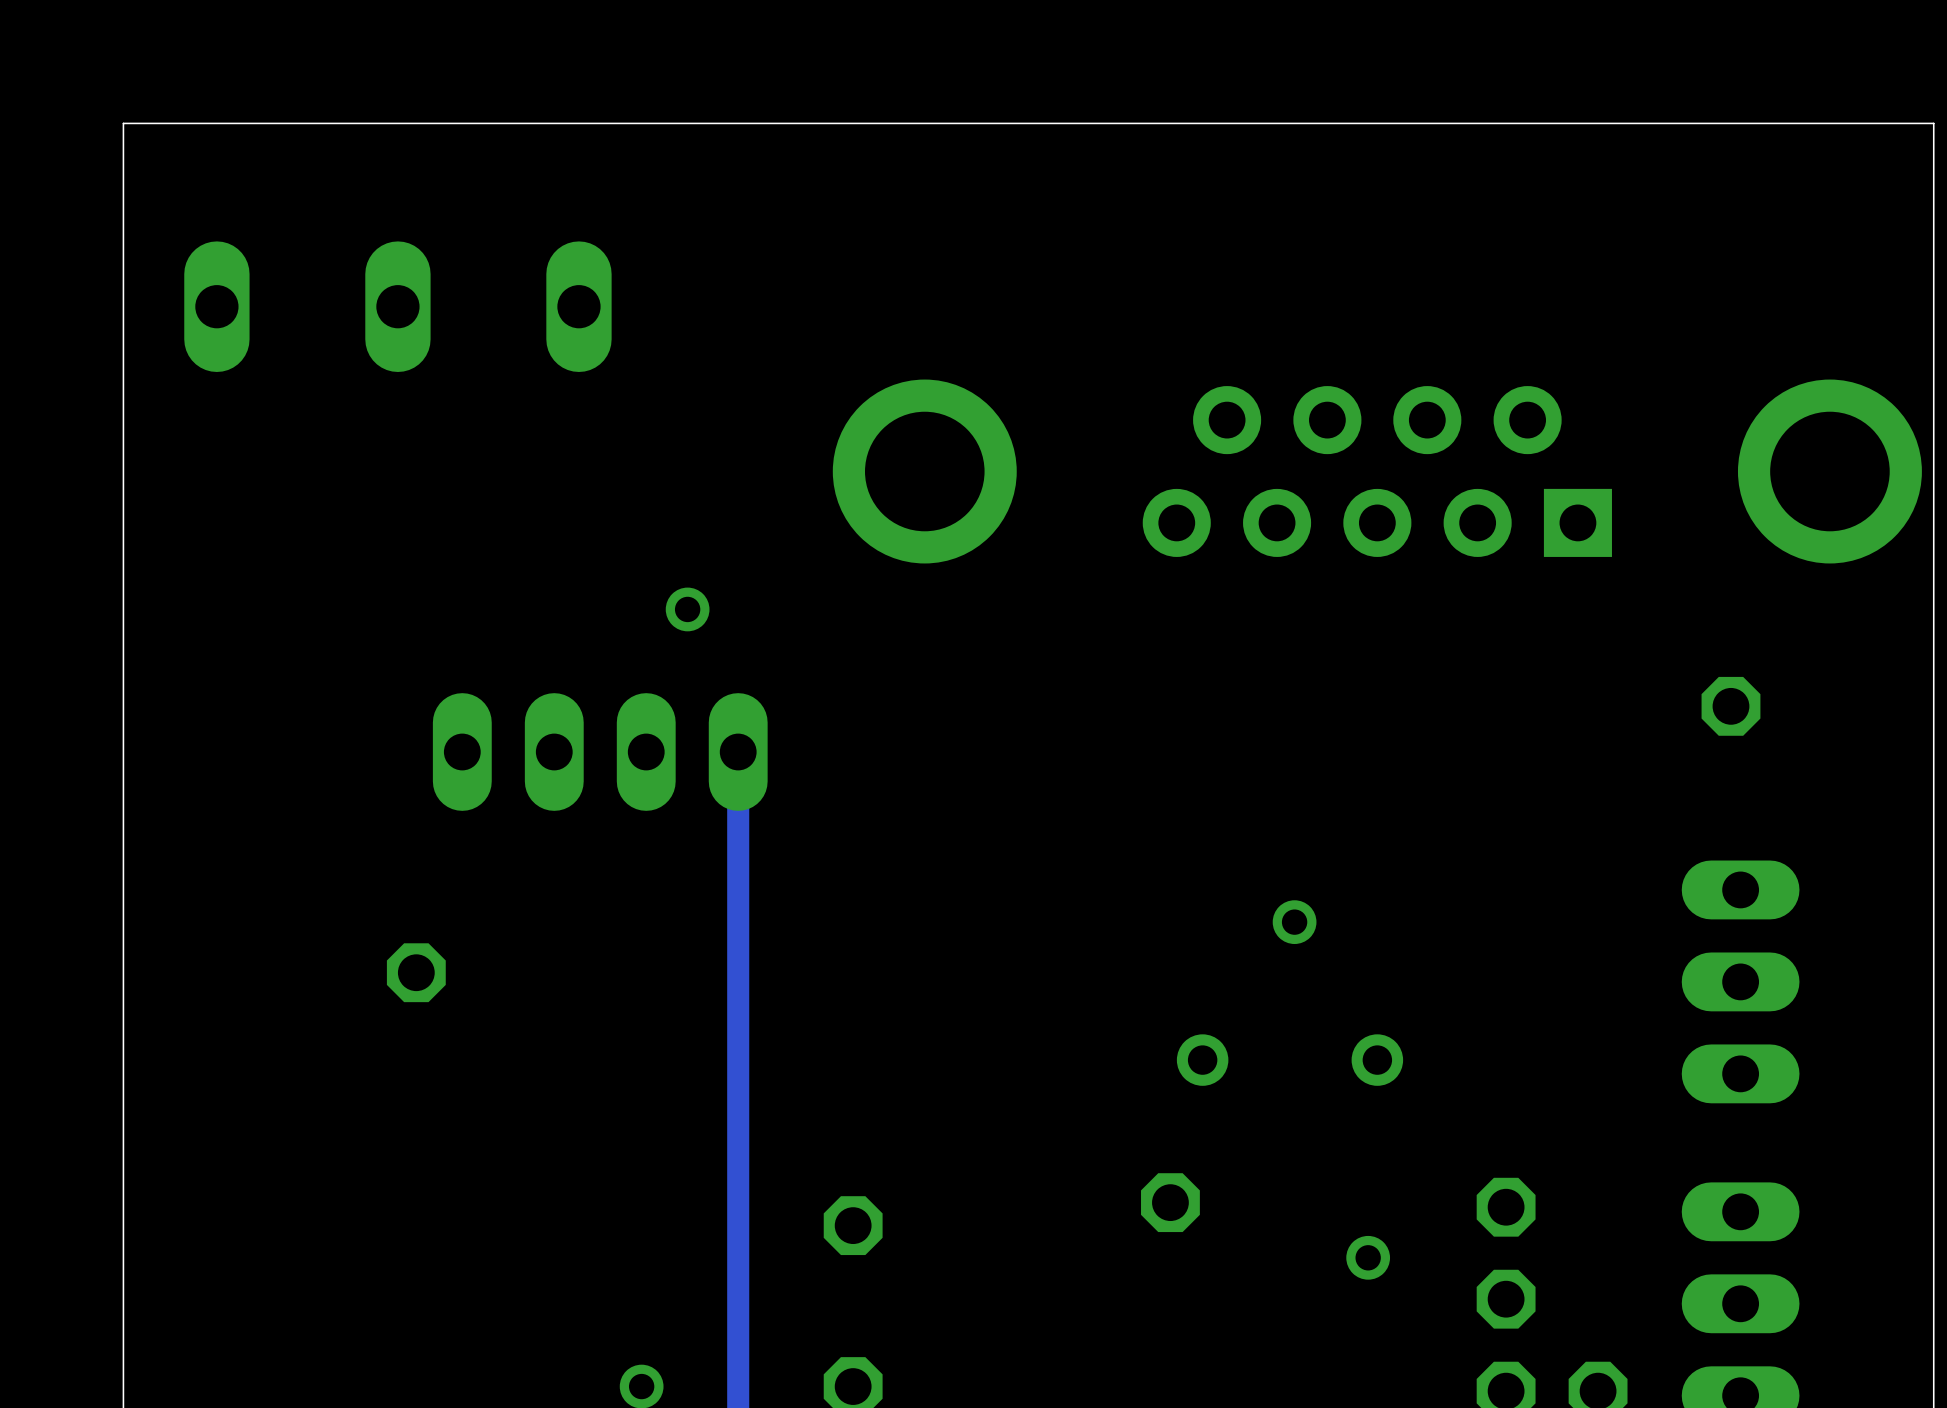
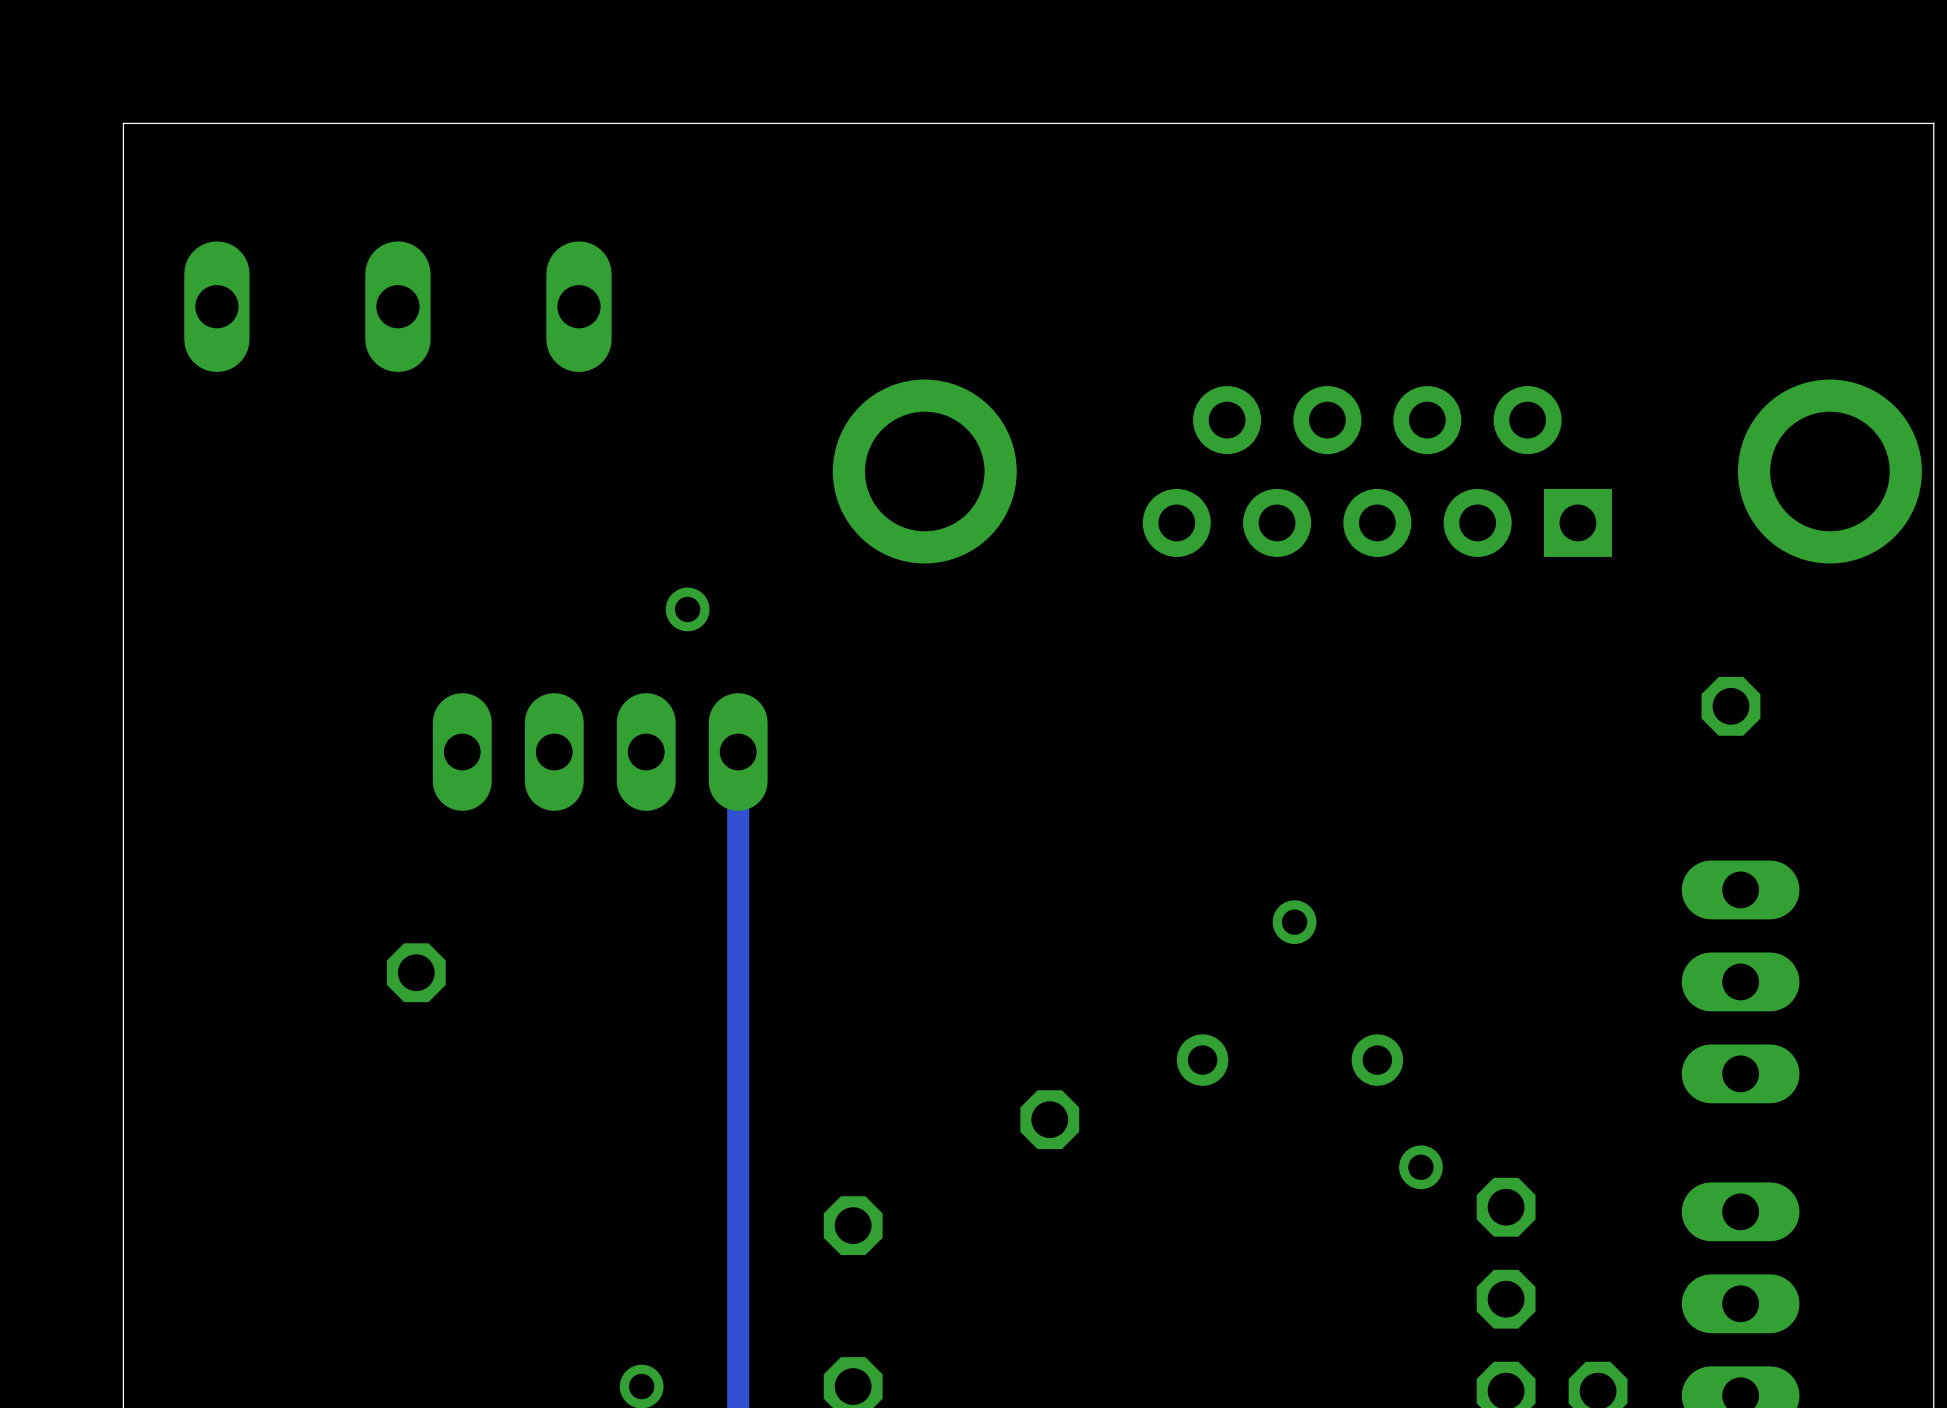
part position: (1170, 1202) -> (1049, 1119)
via position: (1368, 1257) -> (1420, 1167)

